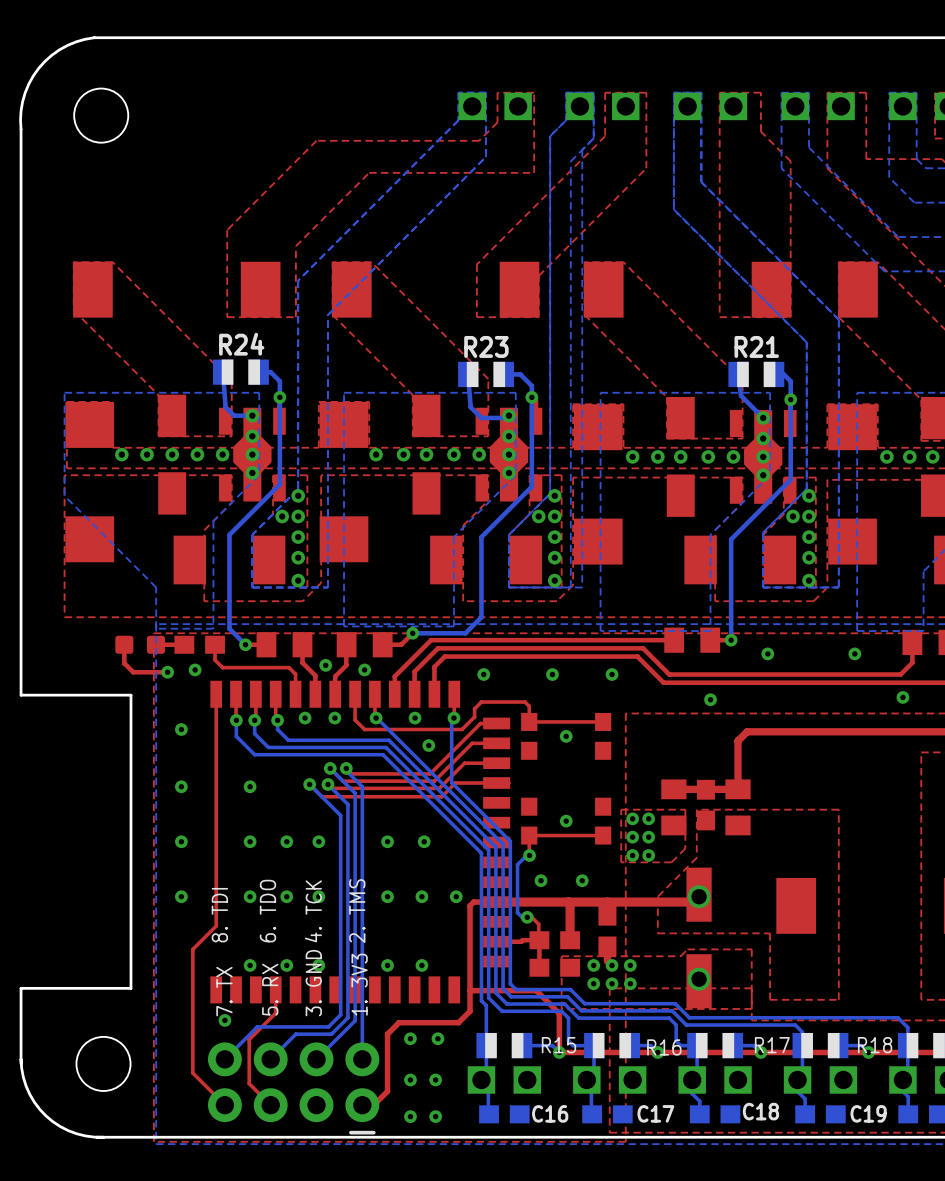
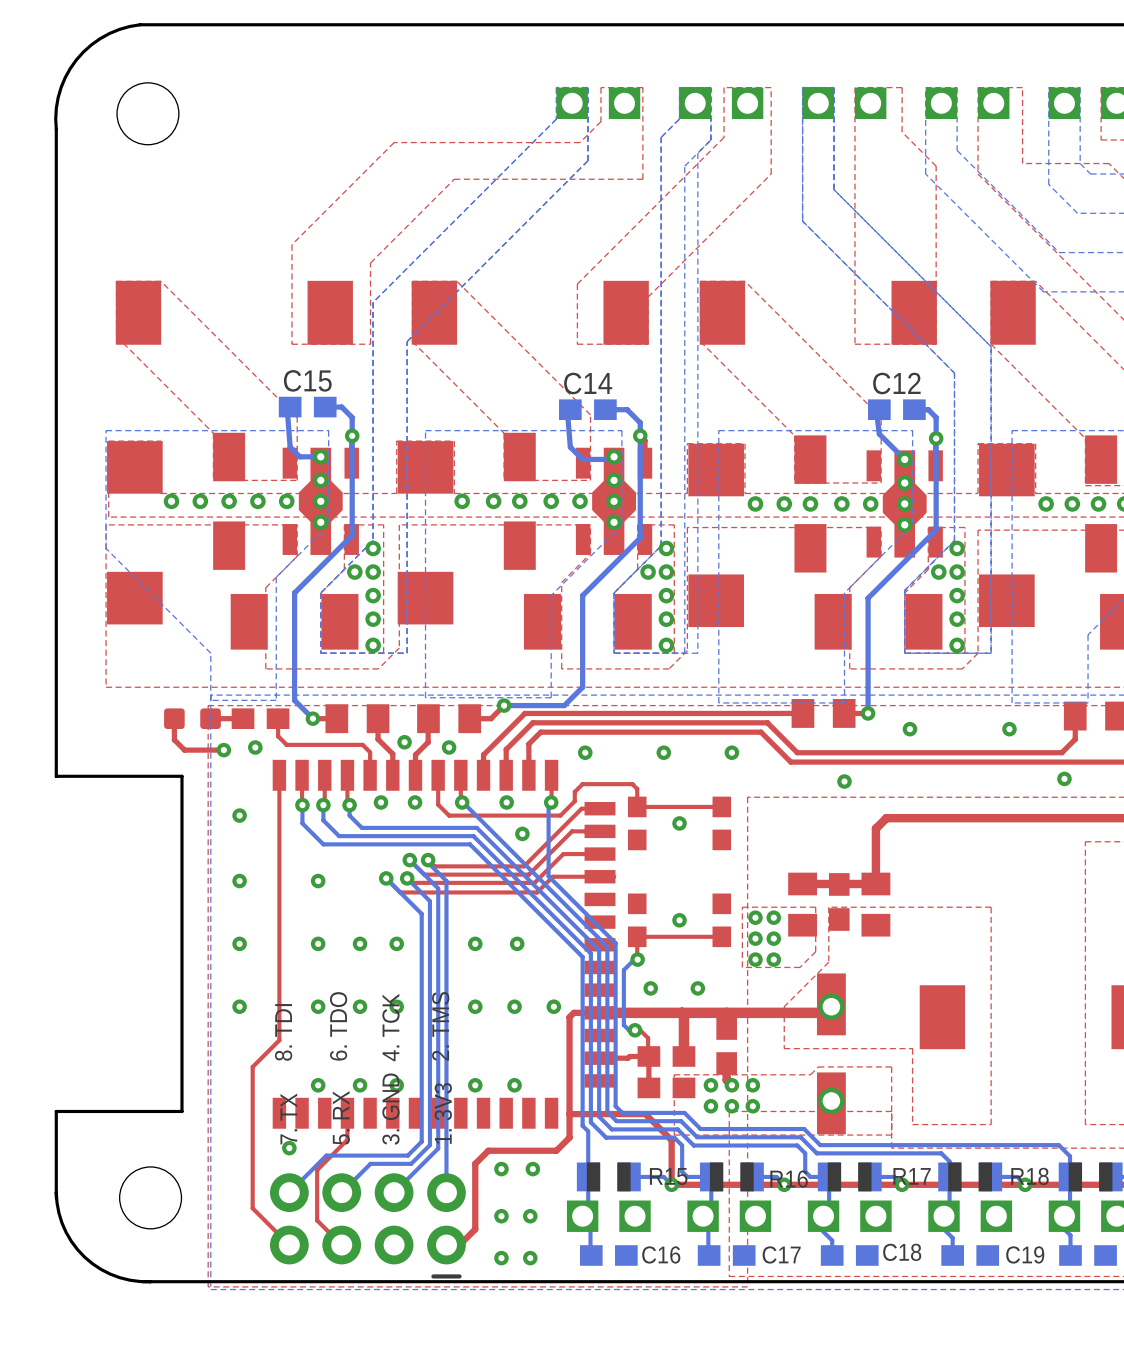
R24: (240, 372) -> none
C15: none -> (307, 407)
R23: (486, 374) -> none
C14: none -> (587, 409)
R21: (756, 374) -> none
C12: none -> (896, 409)

